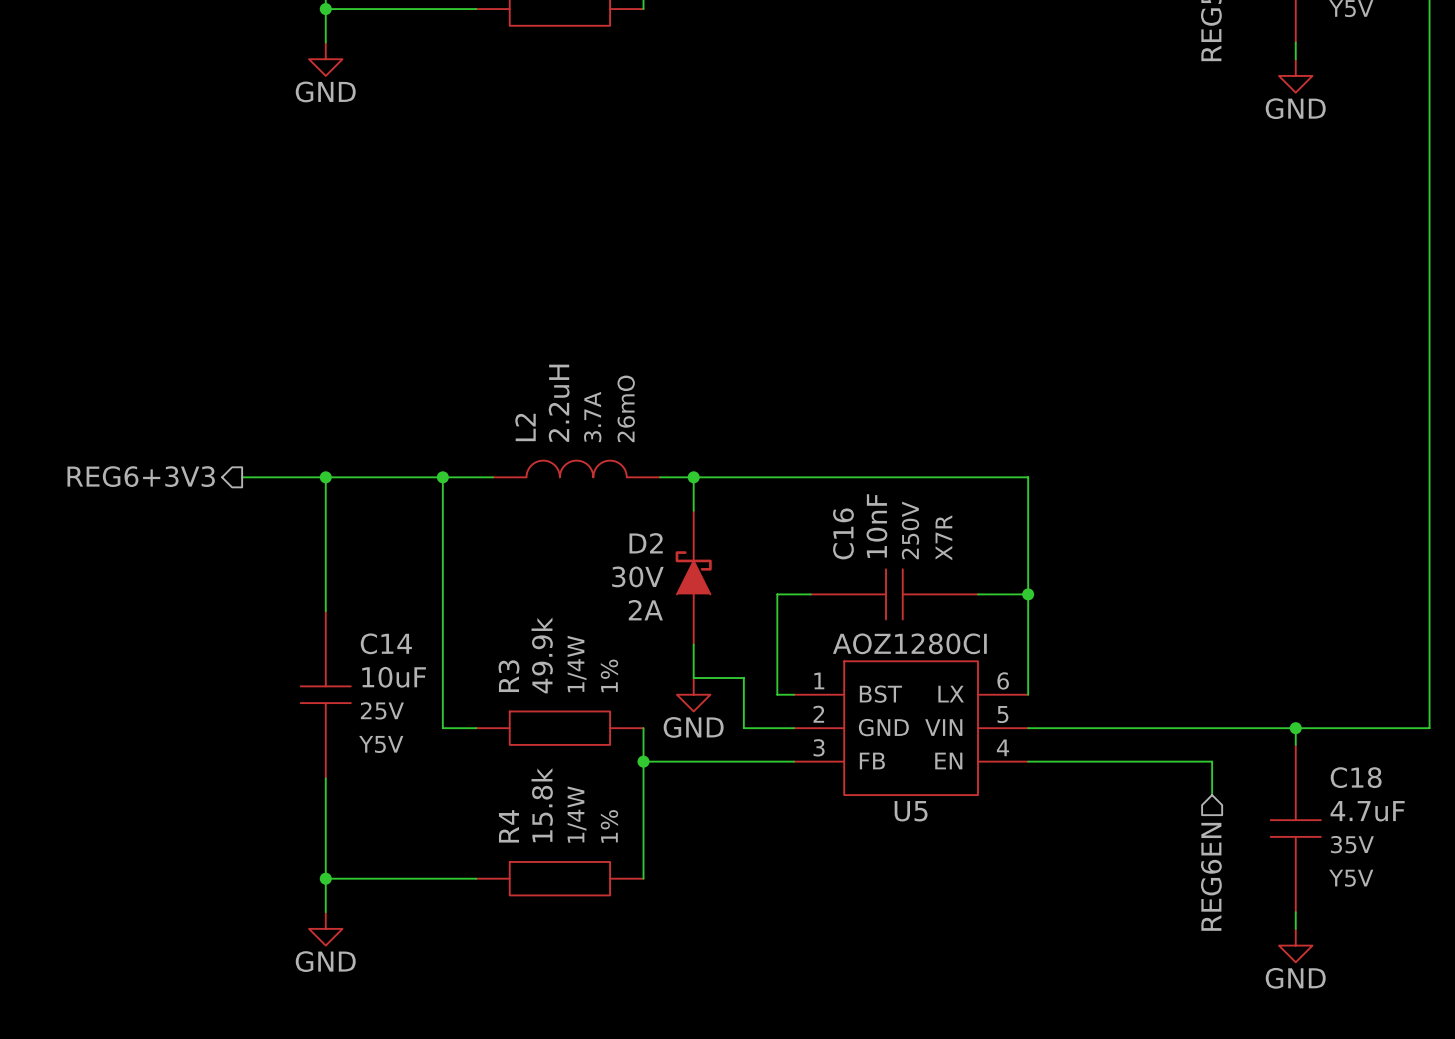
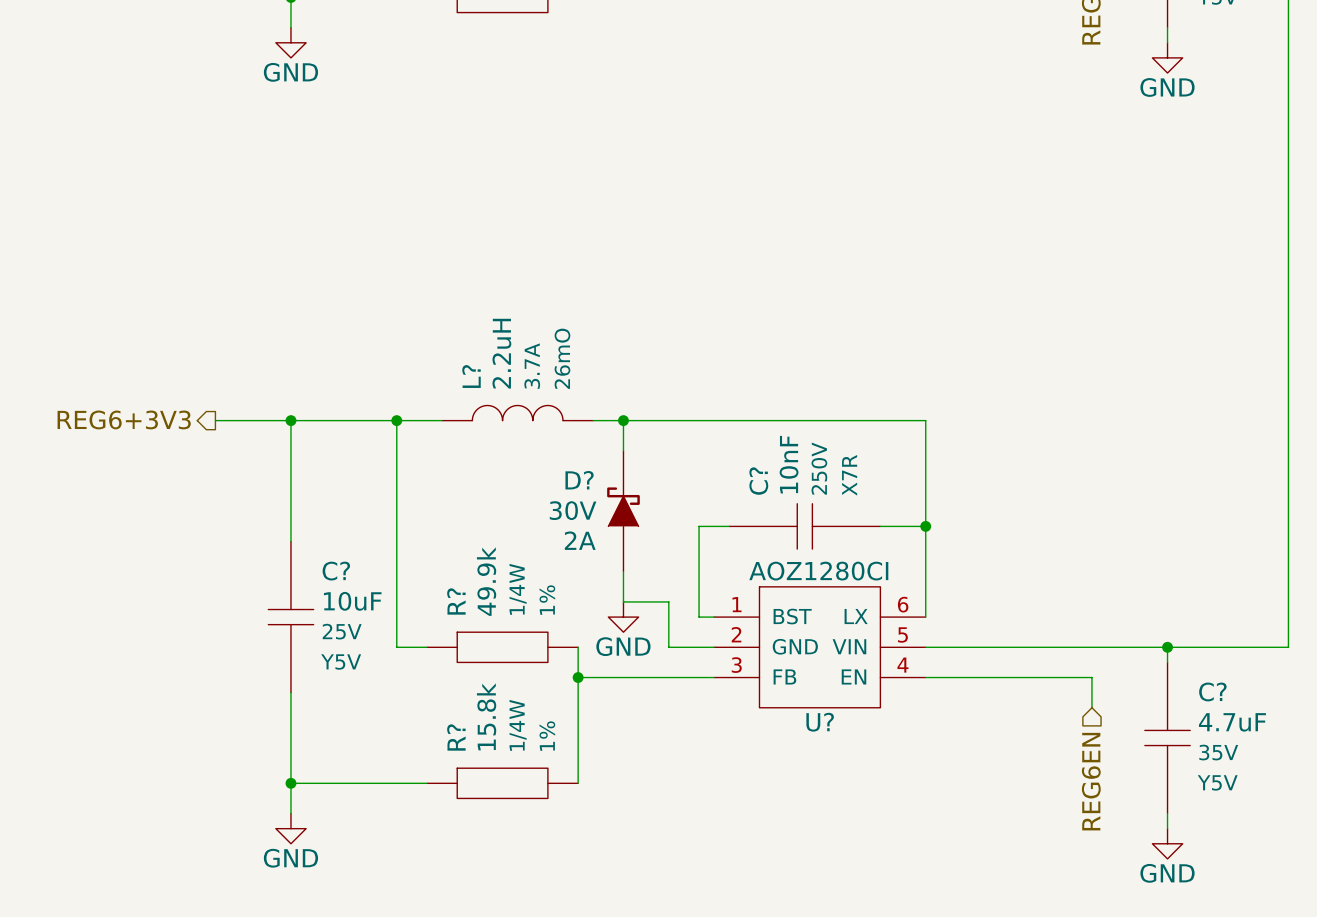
L2 name: L2 (525, 427) -> L? (471, 376)
C16 name: C16 (843, 533) -> C? (758, 481)
D2 name: D2 (646, 543) -> D? (579, 480)
C14 name: C14 (386, 643) -> C? (336, 571)
R3 name: R3 (508, 676) -> R? (456, 601)
C18 name: C18 (1356, 777) -> C? (1212, 691)
U5 name: U5 (911, 811) -> U? (820, 722)
R4 name: R4 (508, 826) -> R? (456, 737)

